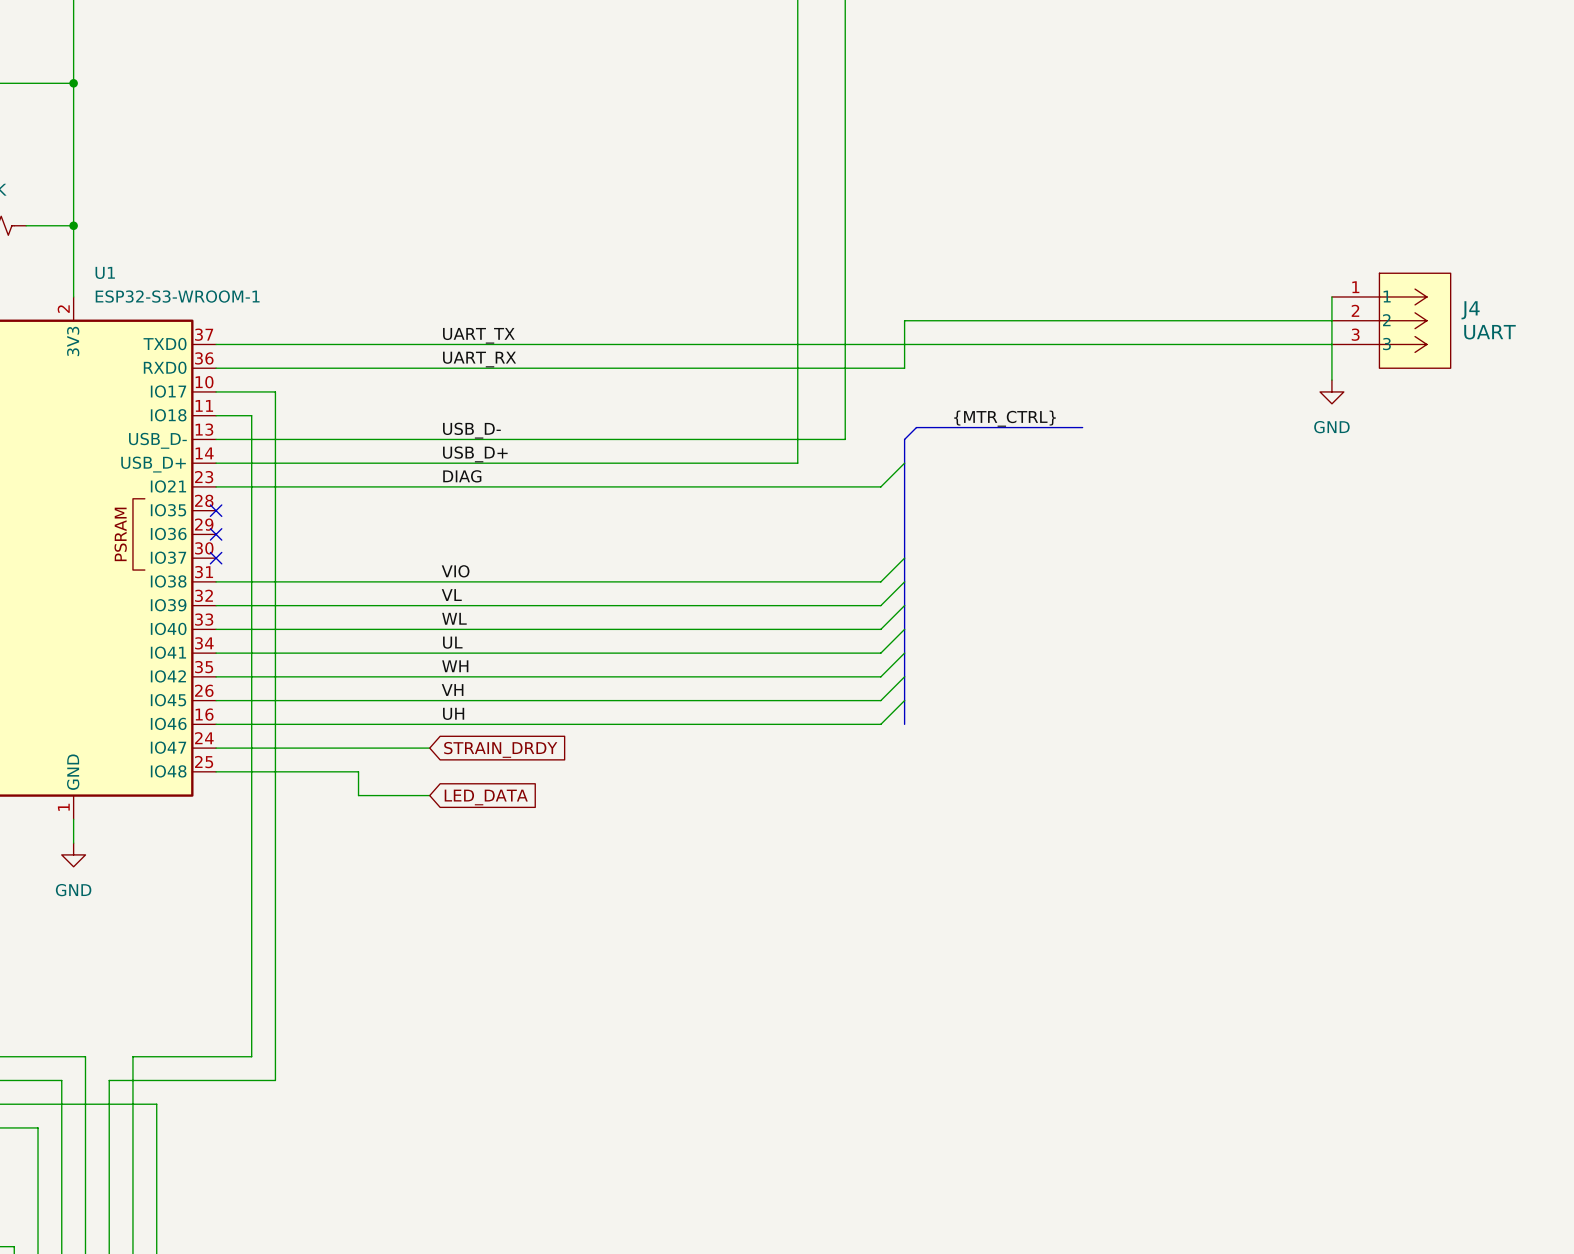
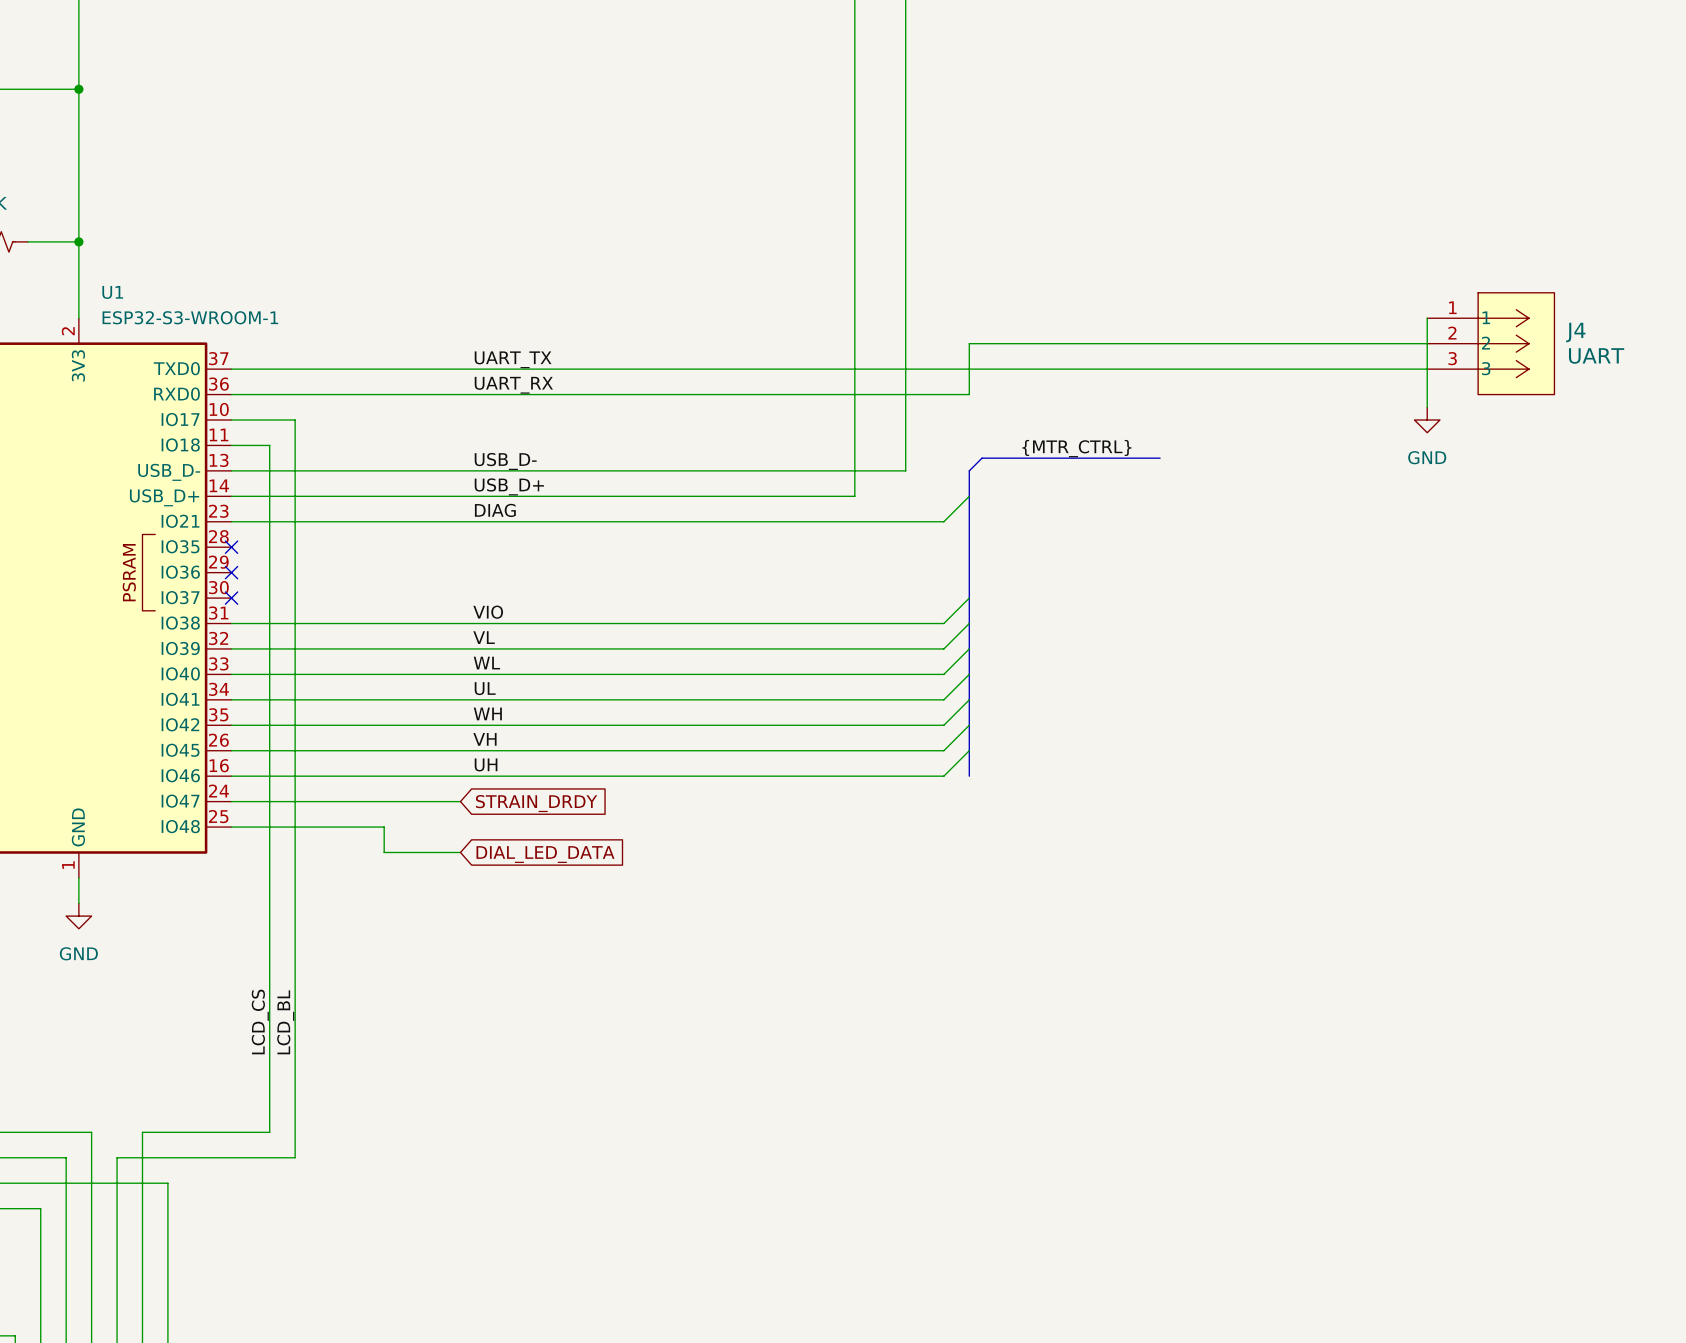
global label: LED_DATA (486, 797) -> DIAL_LED_DATA (545, 854)
label: none -> LCD_CS (260, 1021)
label: none -> LCD_BL (285, 1022)

